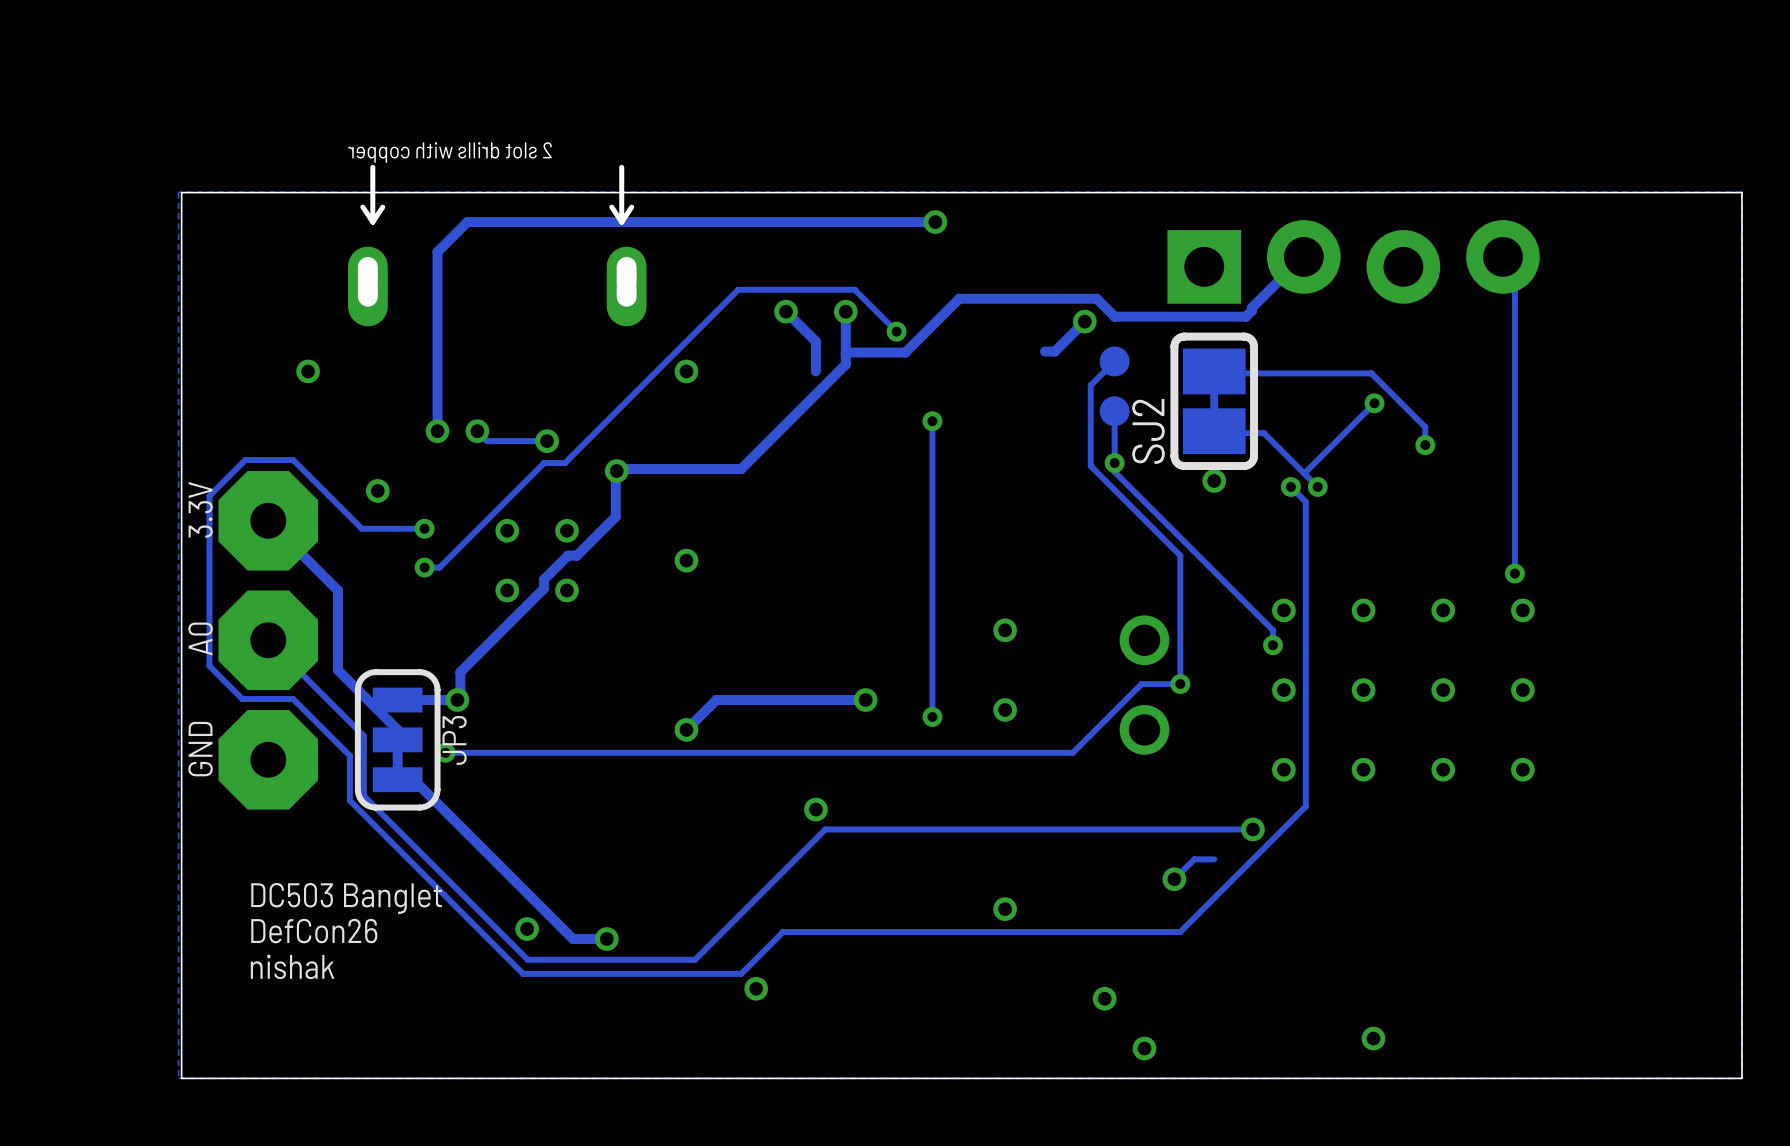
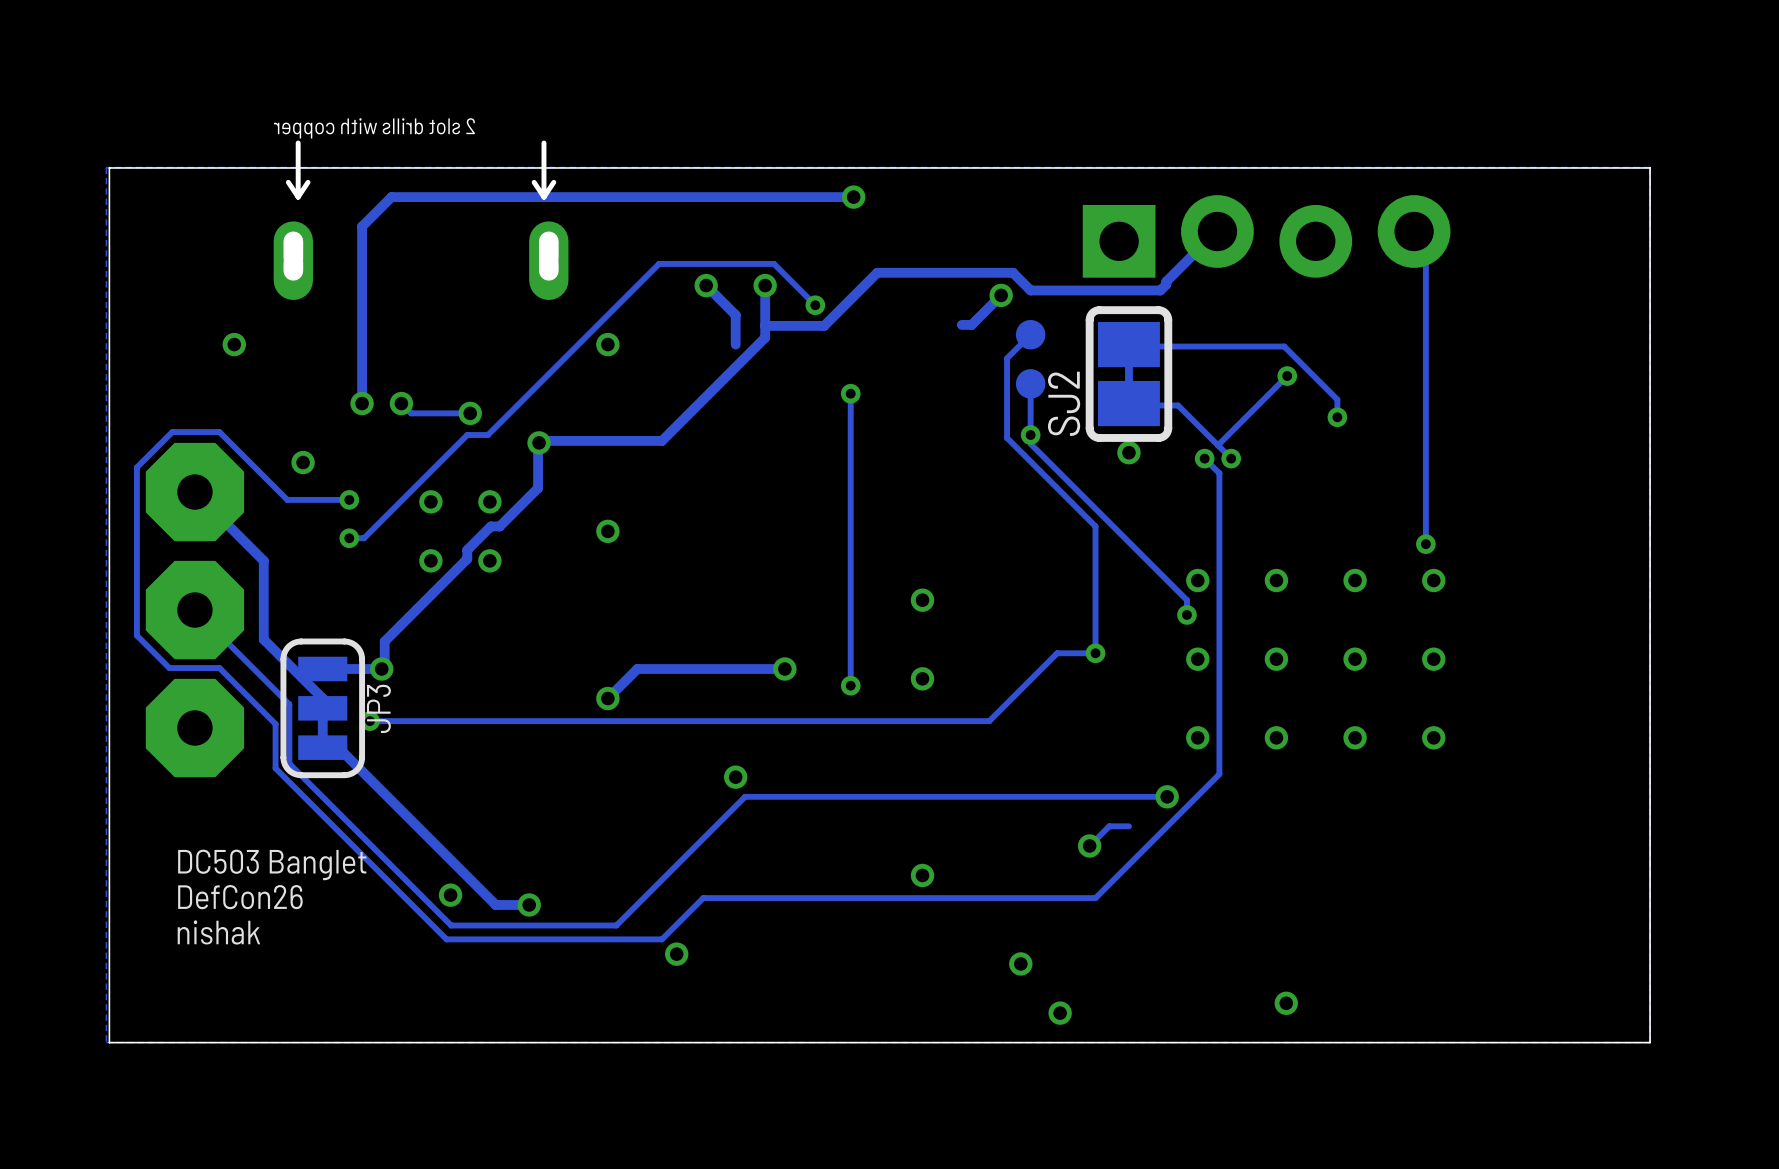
text: 3.3V (200, 509) -> none
text: A0 (200, 638) -> none
part: (1144, 640) -> none
part: (1144, 729) -> none
text: GND (200, 749) -> none

